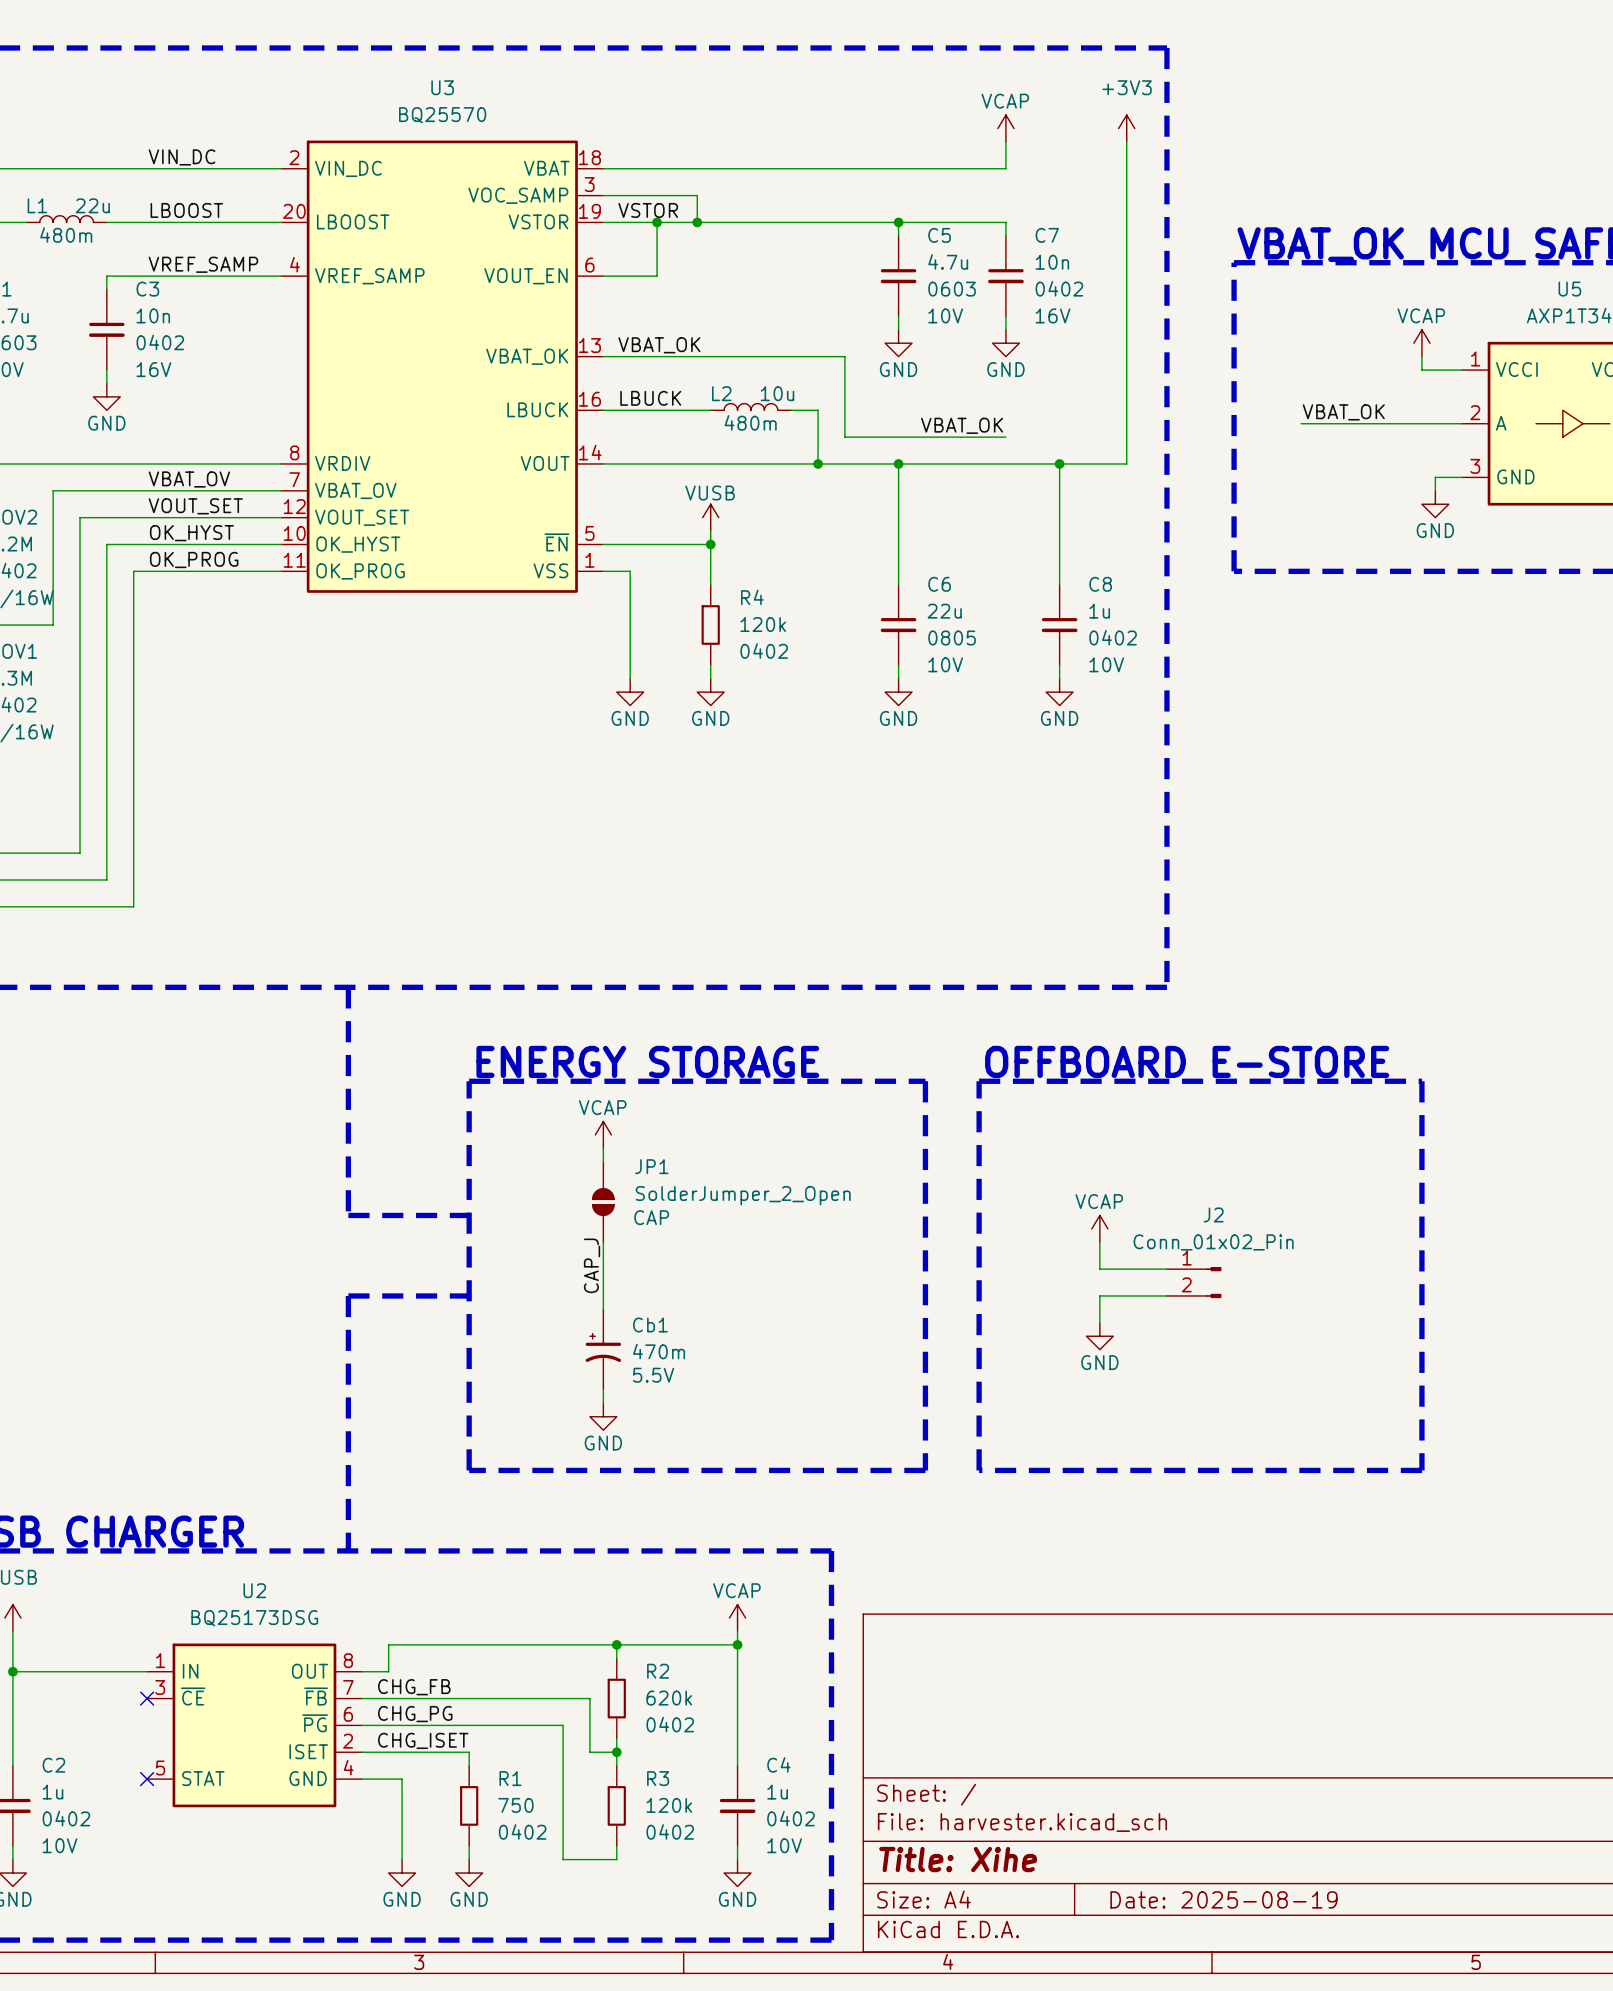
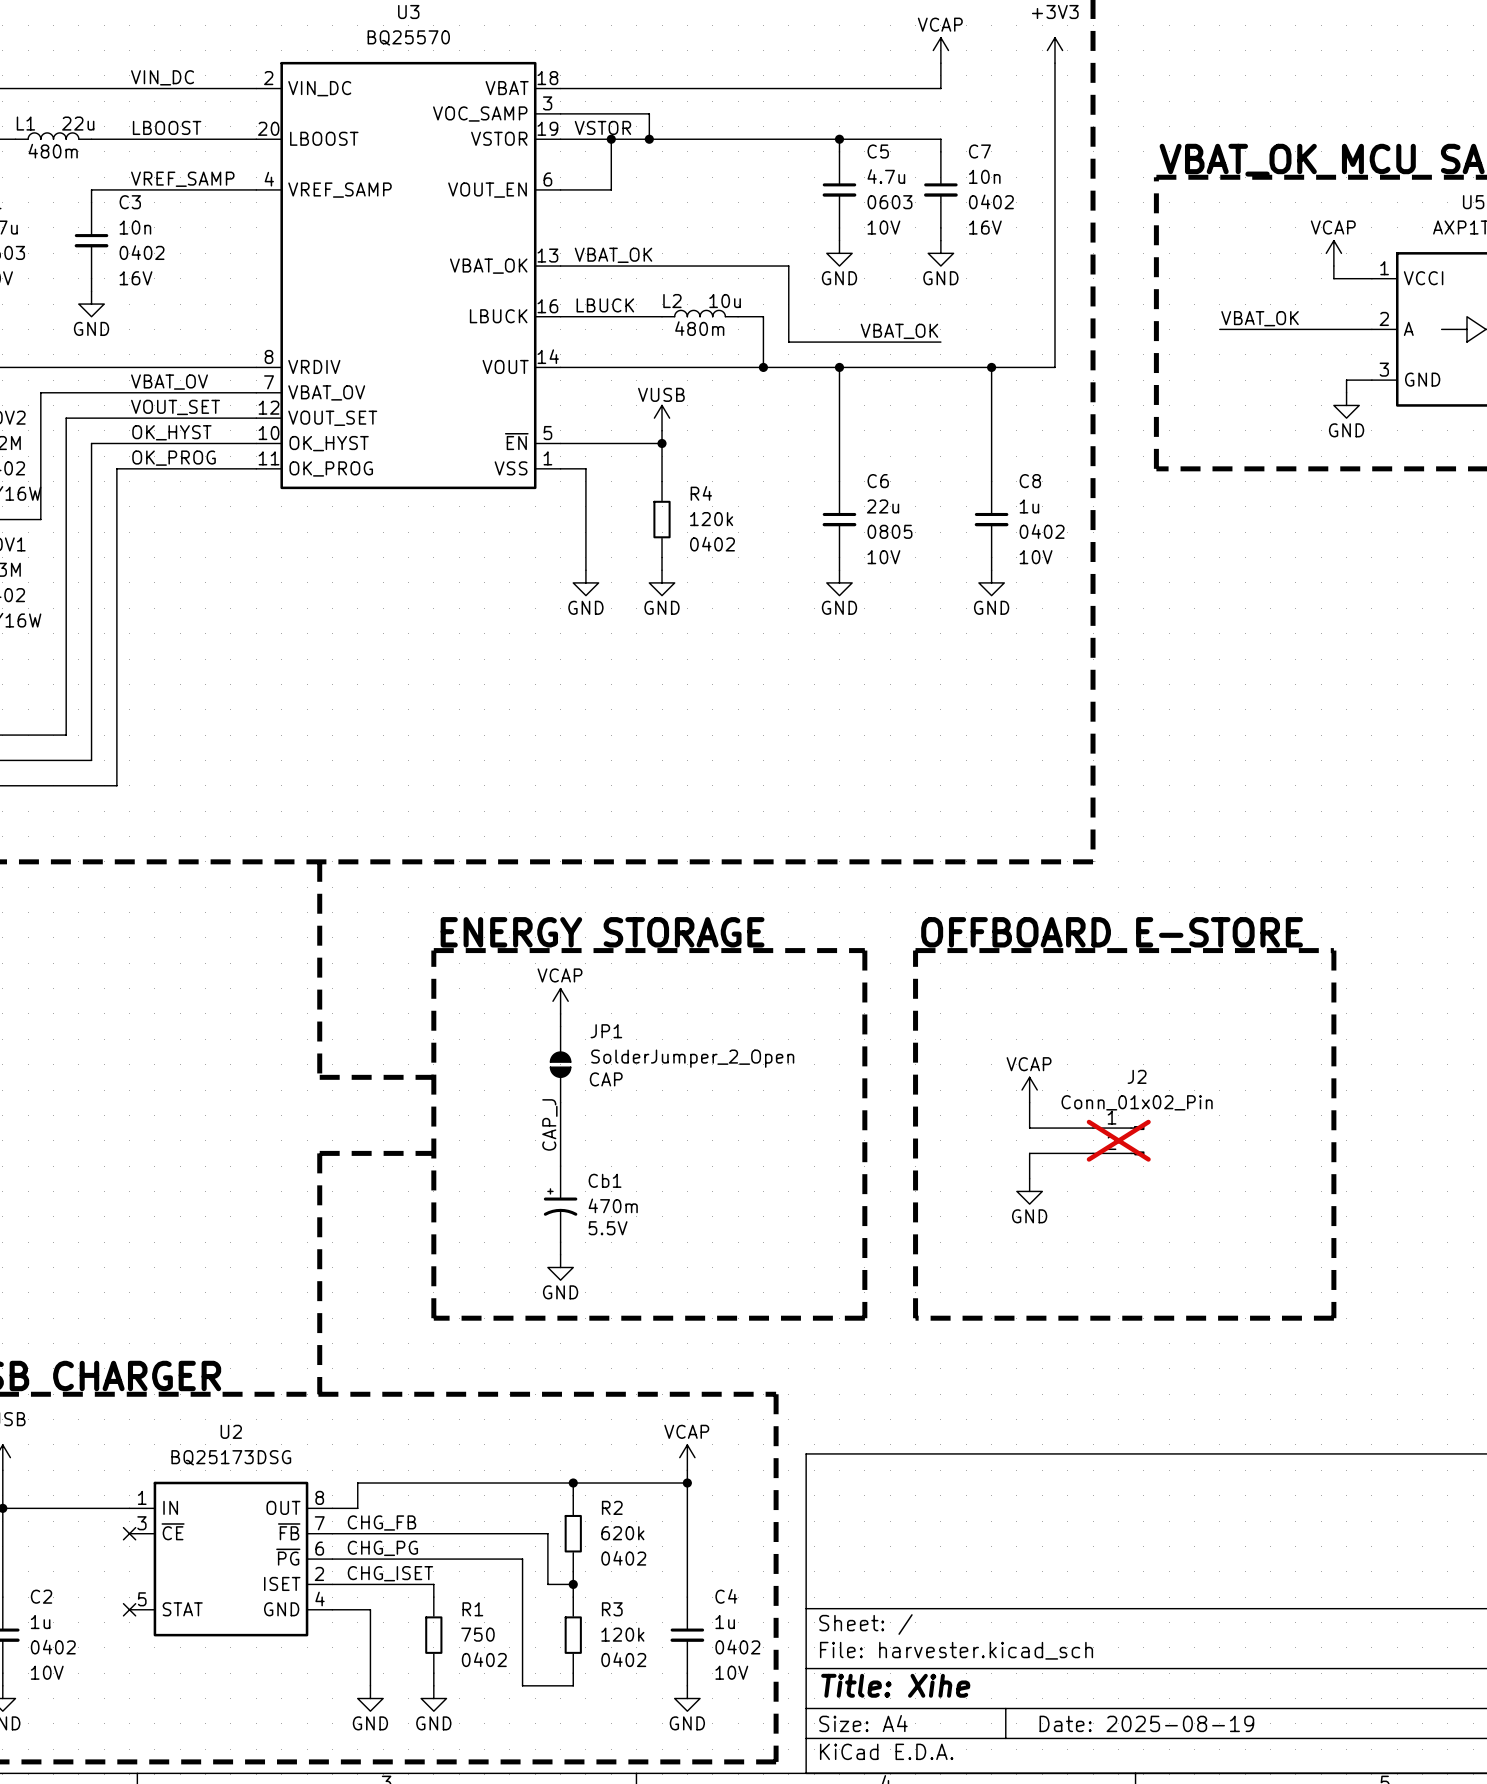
J2 do-not-place cross: none -> (1118, 1140)

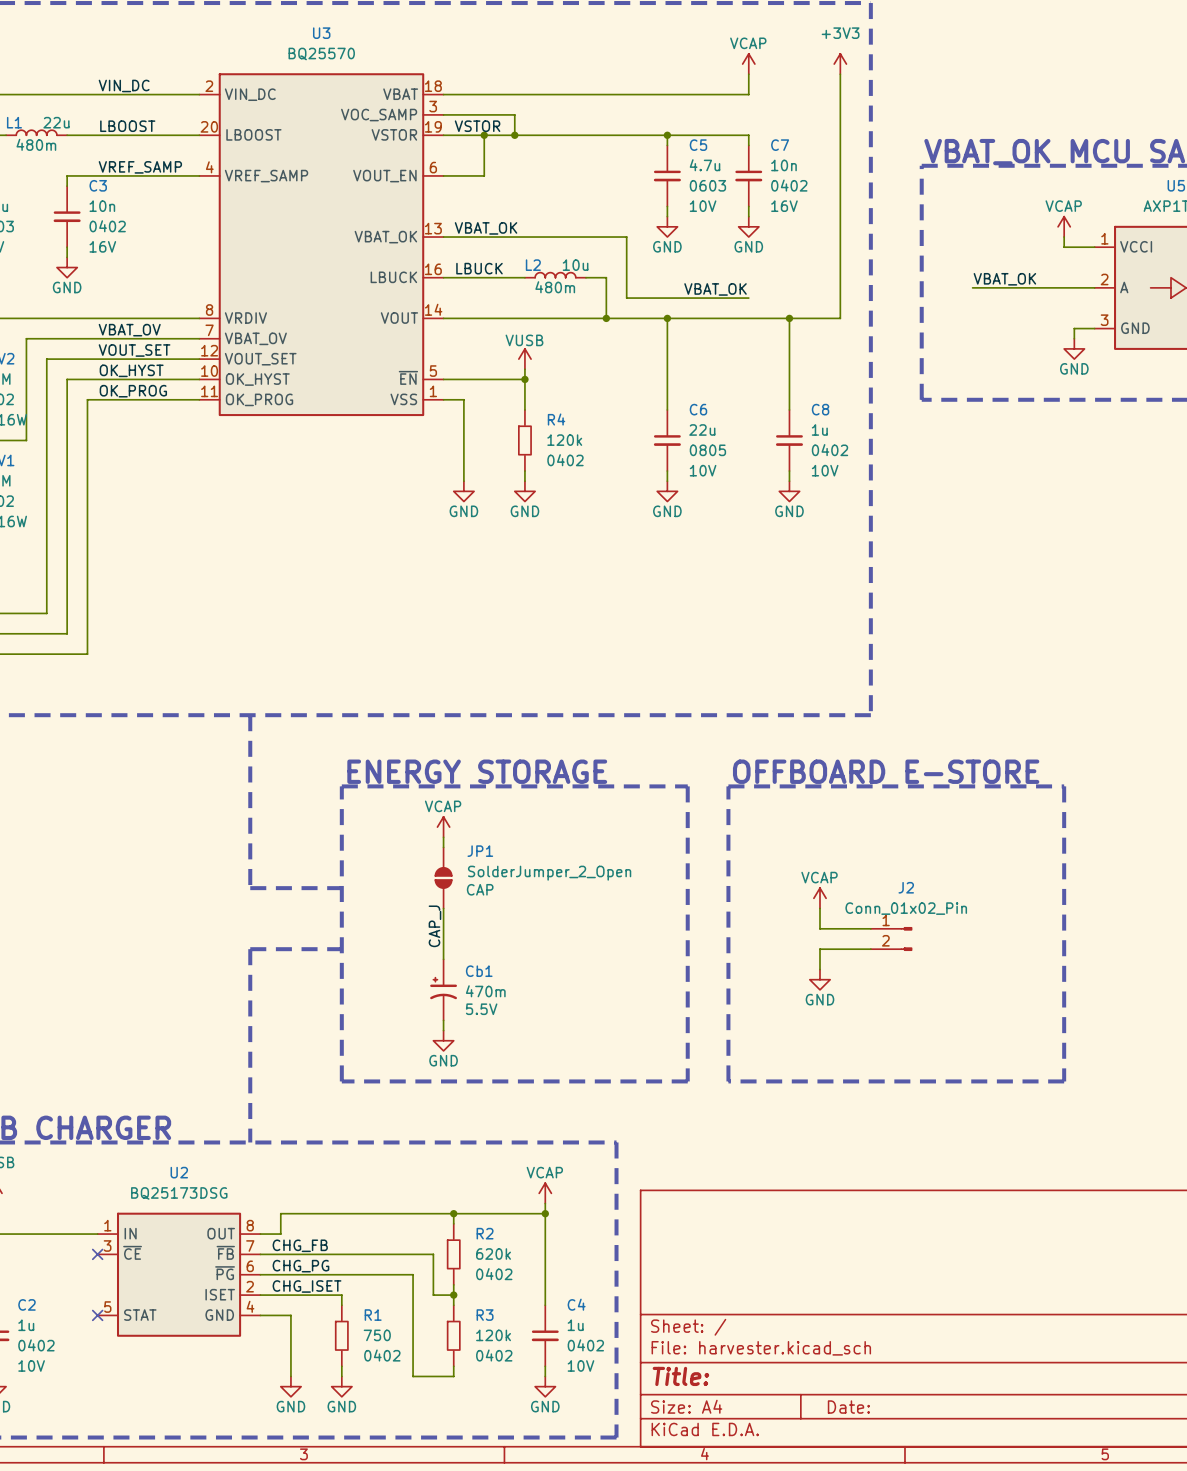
J2 do-not-place cross: (1118, 1140) -> none
title block: Title: Xihe (895, 1685) -> Title: (680, 1376)
title block: Date: 2025-08-19 (1146, 1723) -> Date: (848, 1407)

